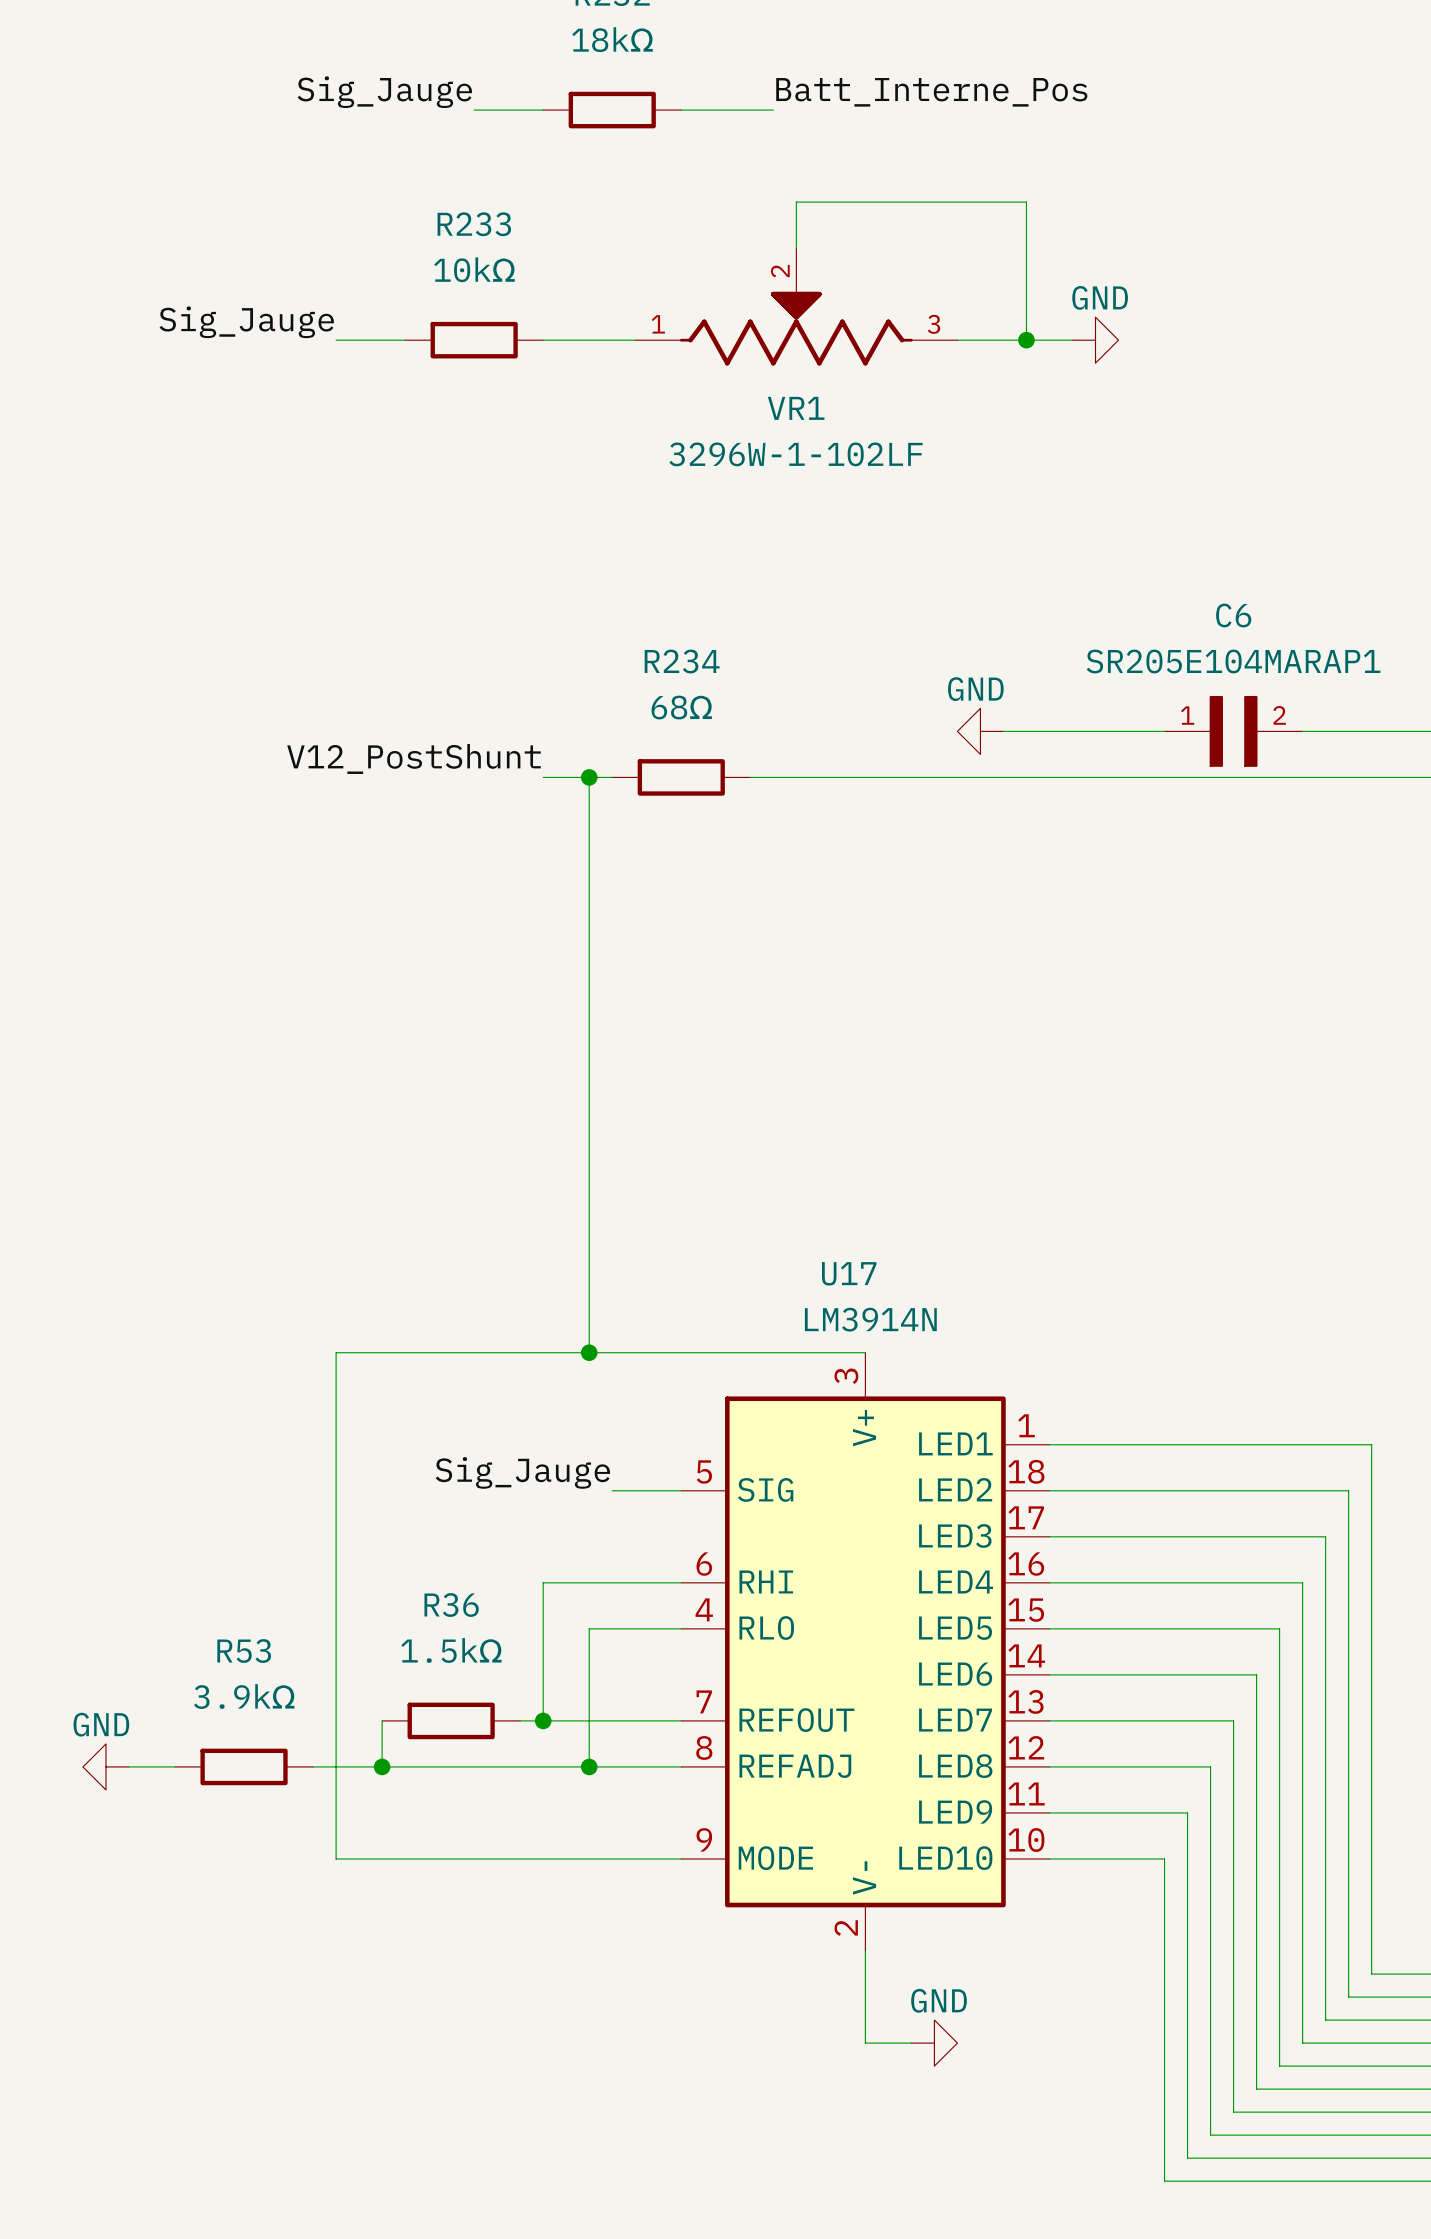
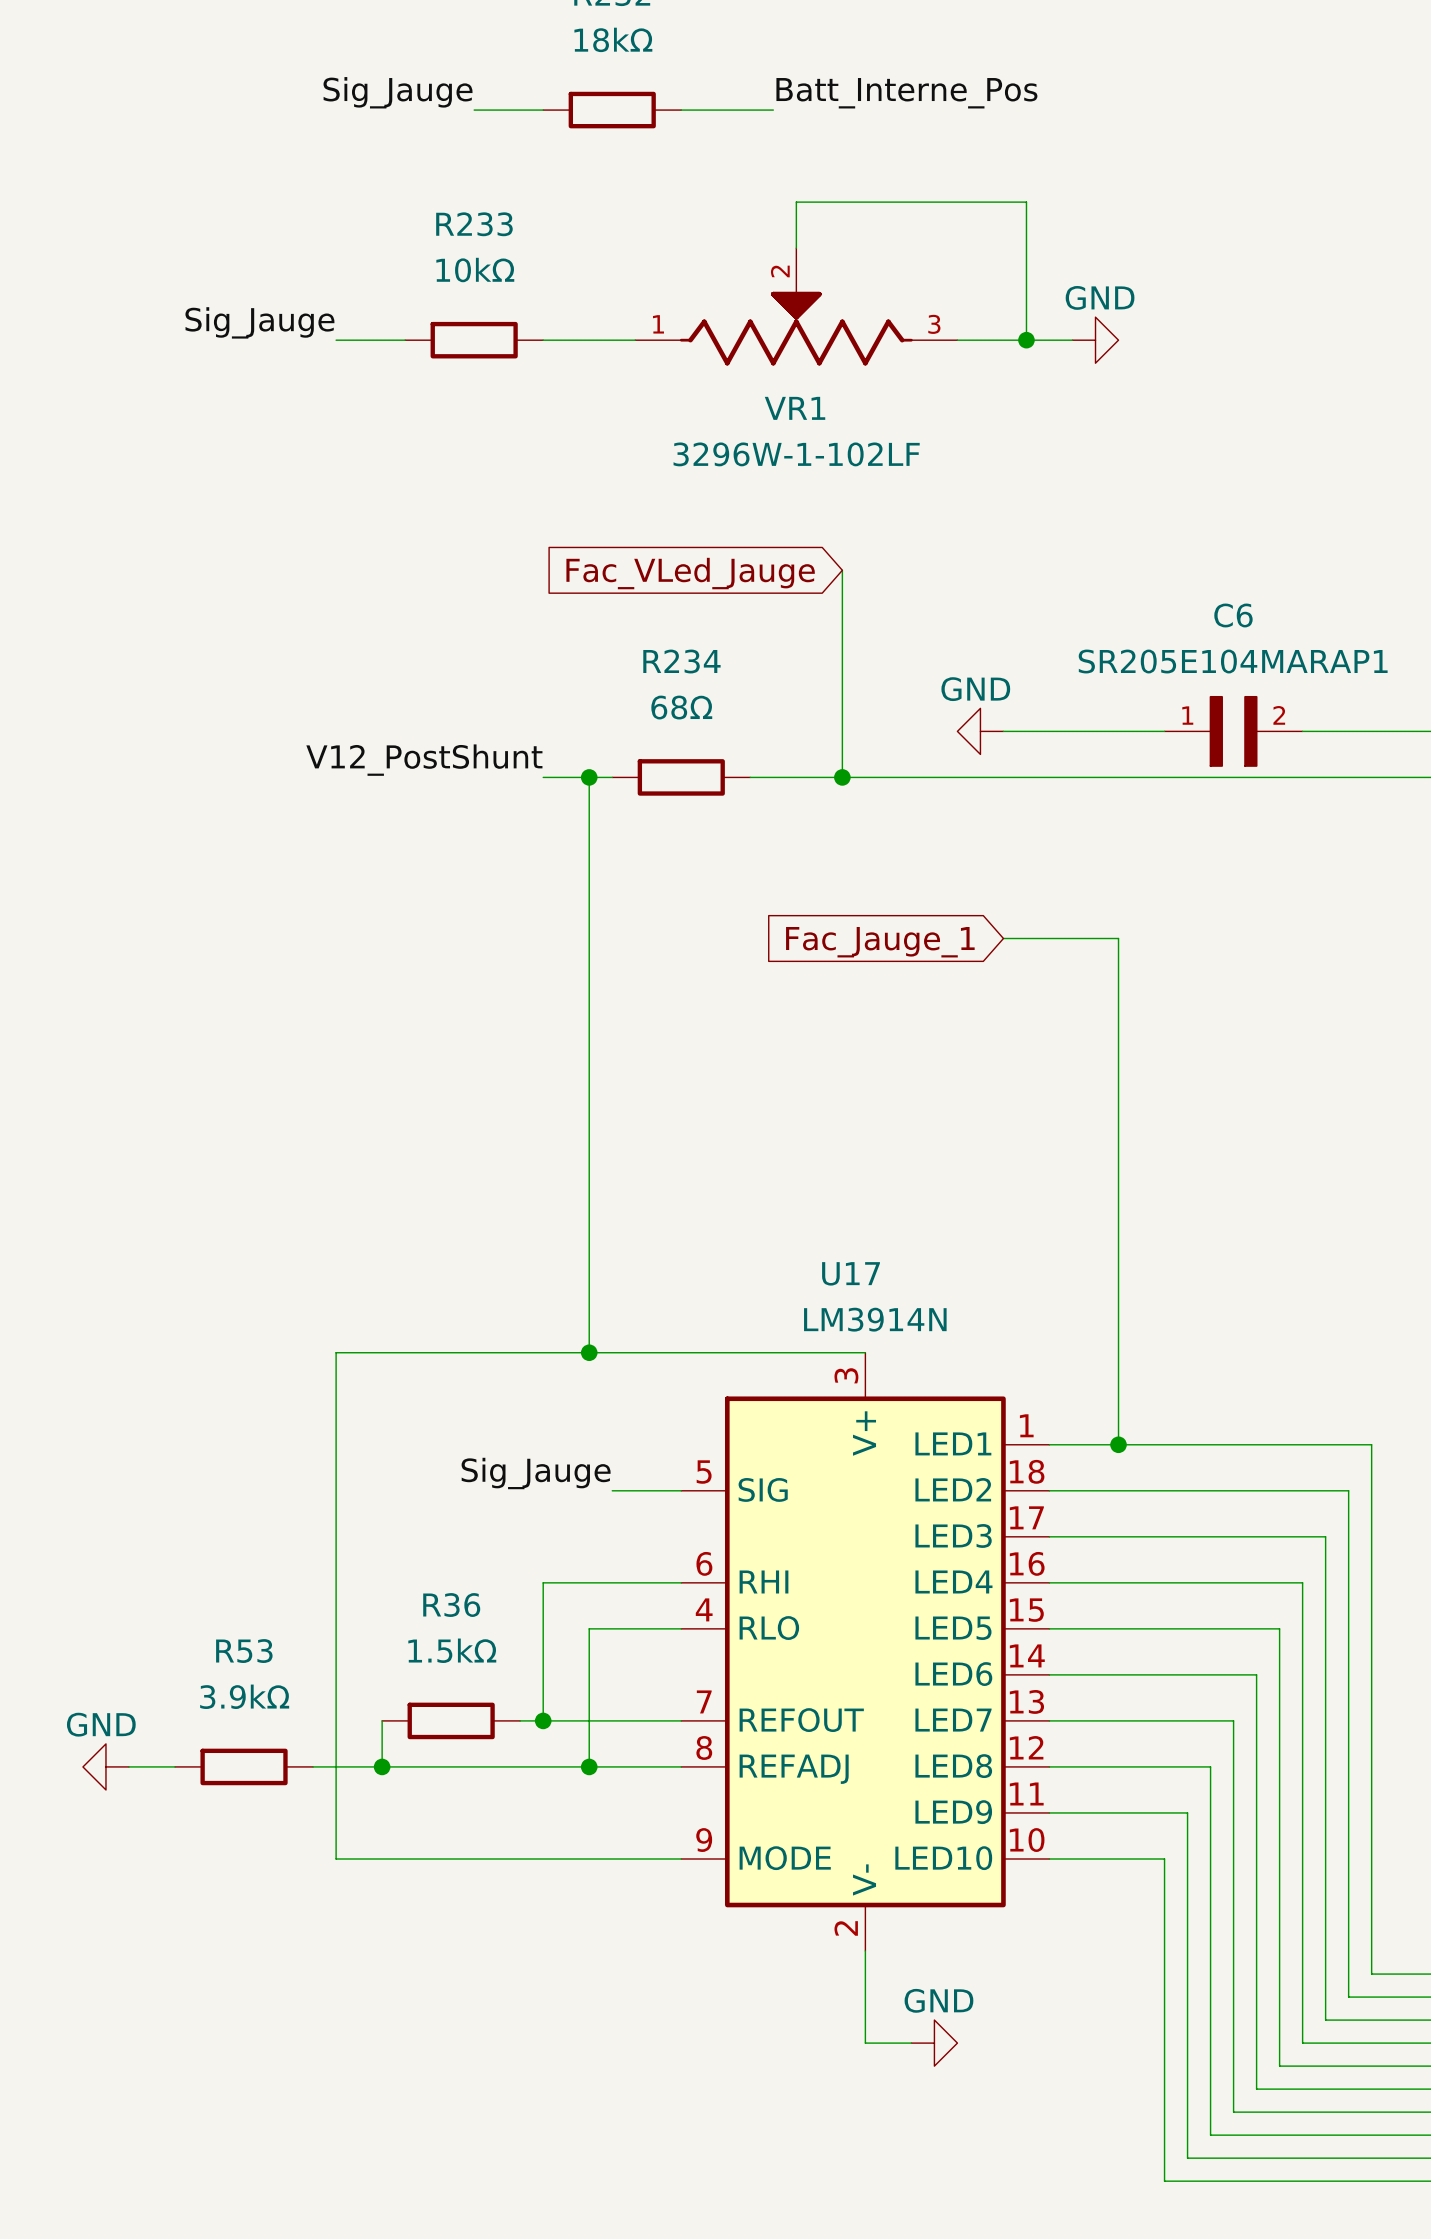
wire: none -> (842, 570) (842, 777)
global label: none -> Fac_VLed_Jauge (690, 573)
junction: none -> (842, 777)
wire: none -> (1003, 938) (1118, 938) (1118, 1444)
global label: none -> Fac_Jauge_1 (880, 942)
junction: none -> (1118, 1444)

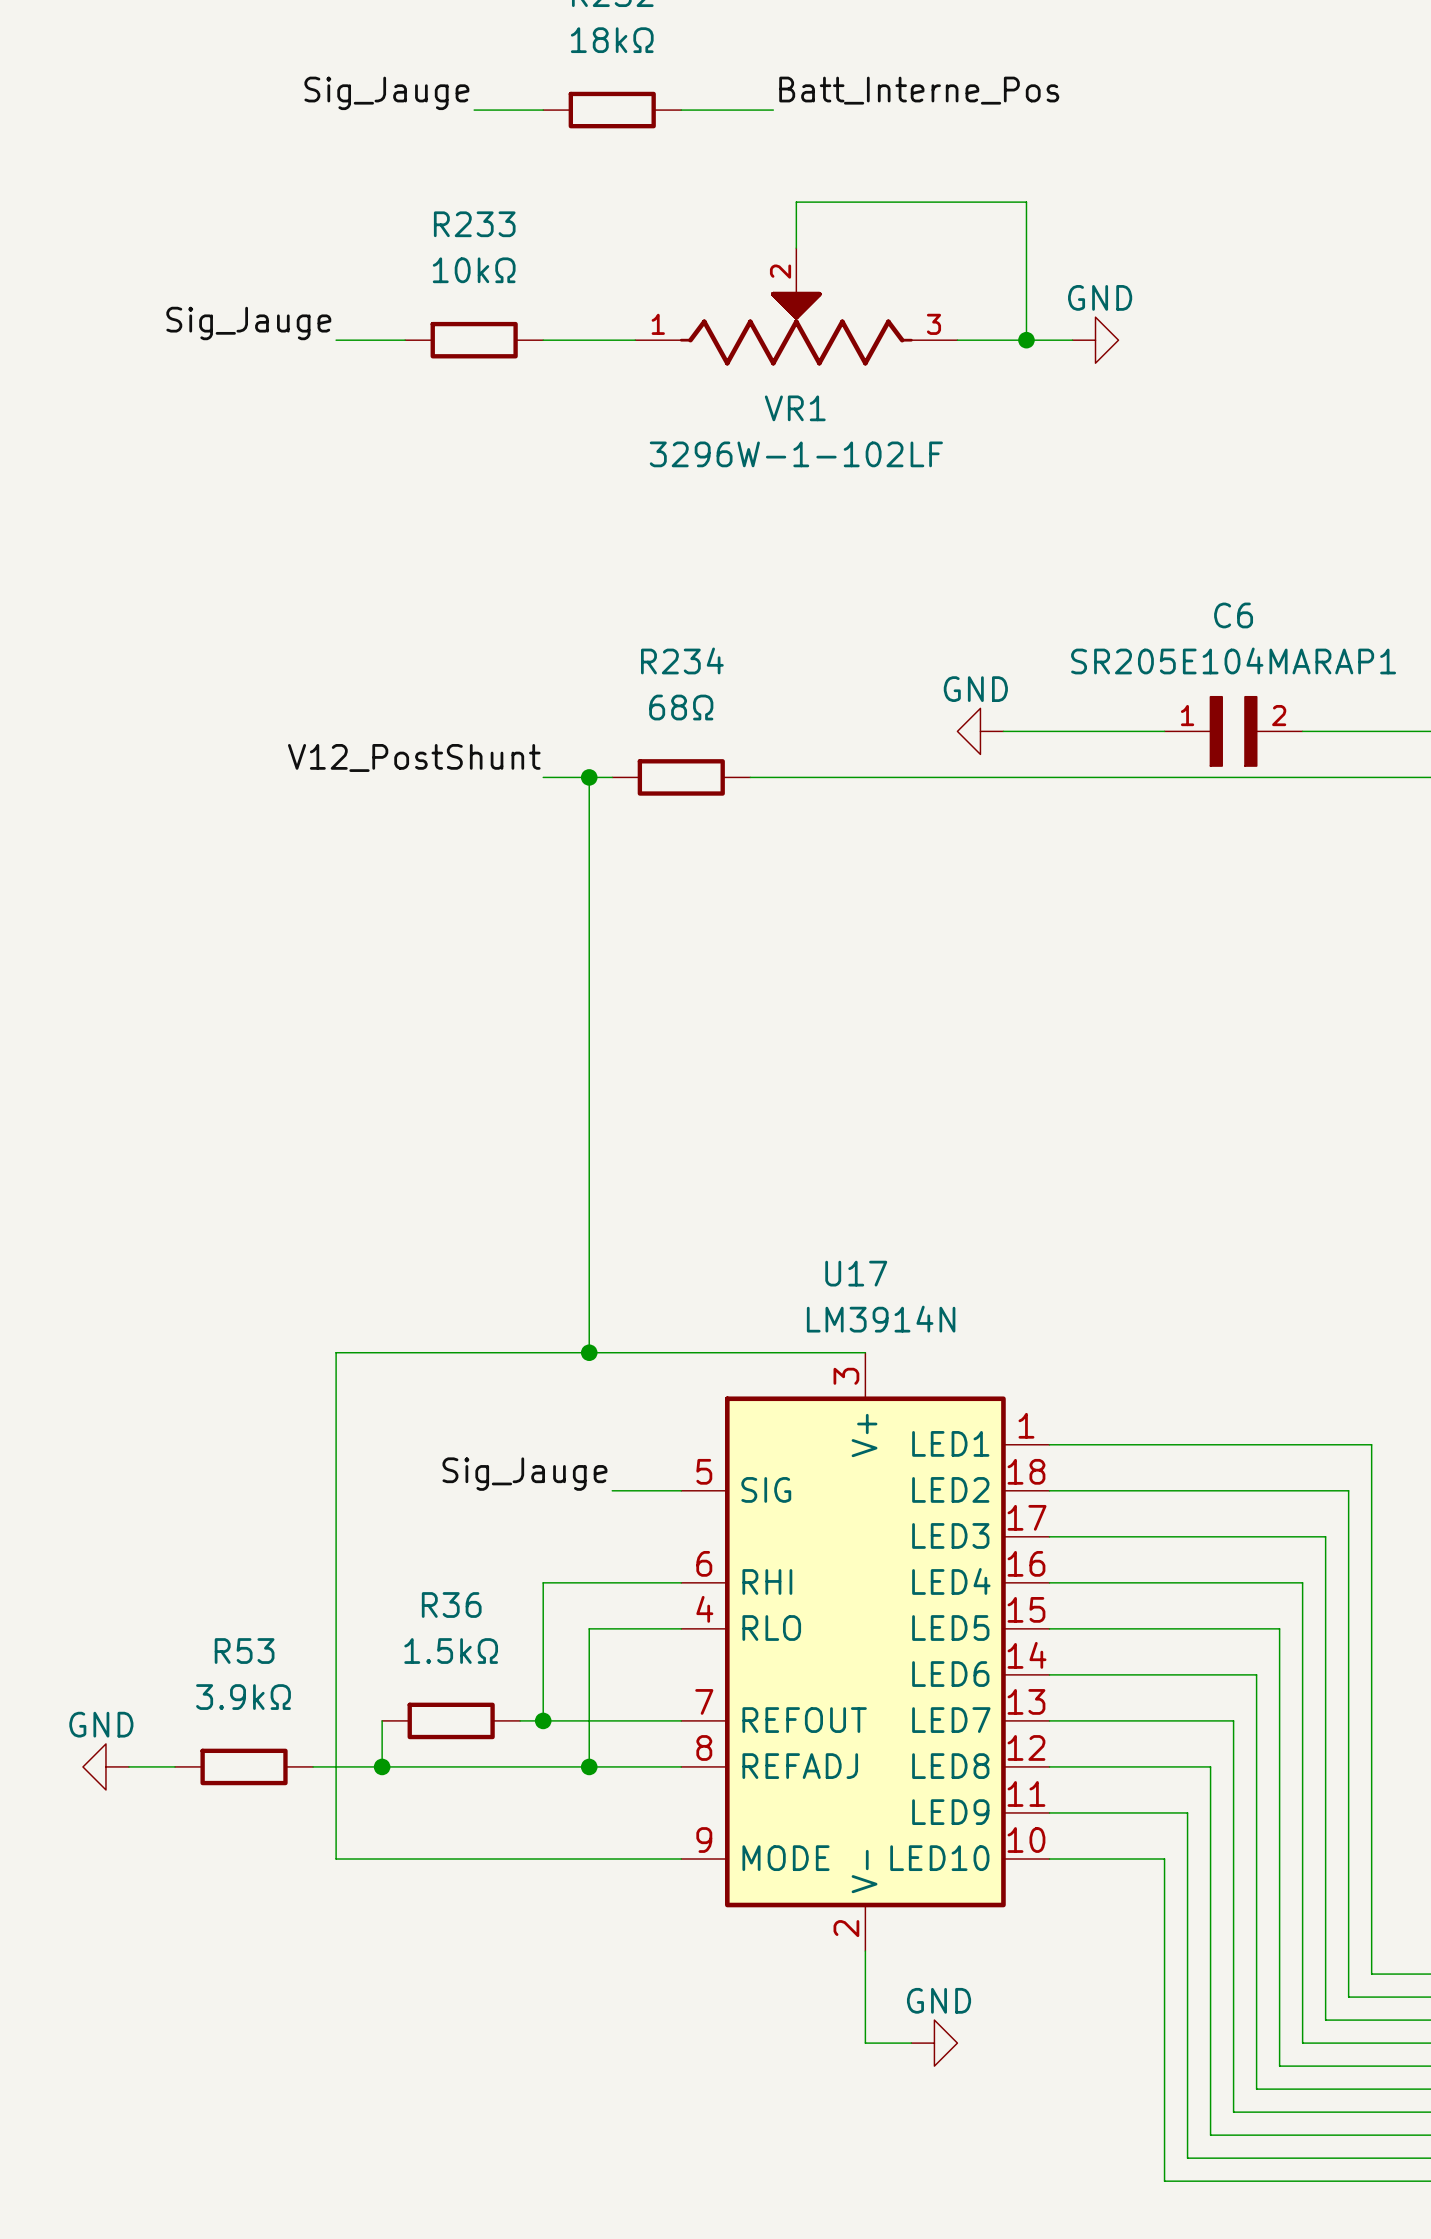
wire: (842, 570) (842, 777) -> none
global label: Fac_VLed_Jauge (690, 573) -> none
junction: (842, 777) -> none
wire: (1003, 938) (1118, 938) (1118, 1444) -> none
global label: Fac_Jauge_1 (880, 942) -> none
junction: (1118, 1444) -> none

